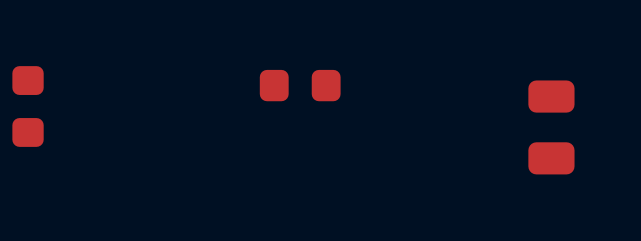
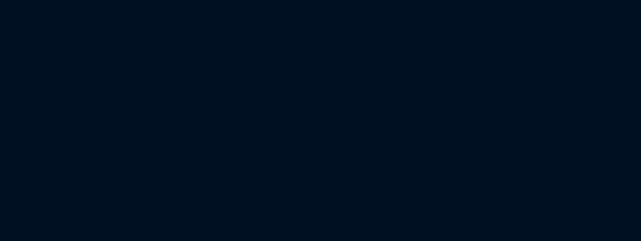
part: (300, 85) -> none
part: (28, 106) -> none
part: (551, 127) -> none

